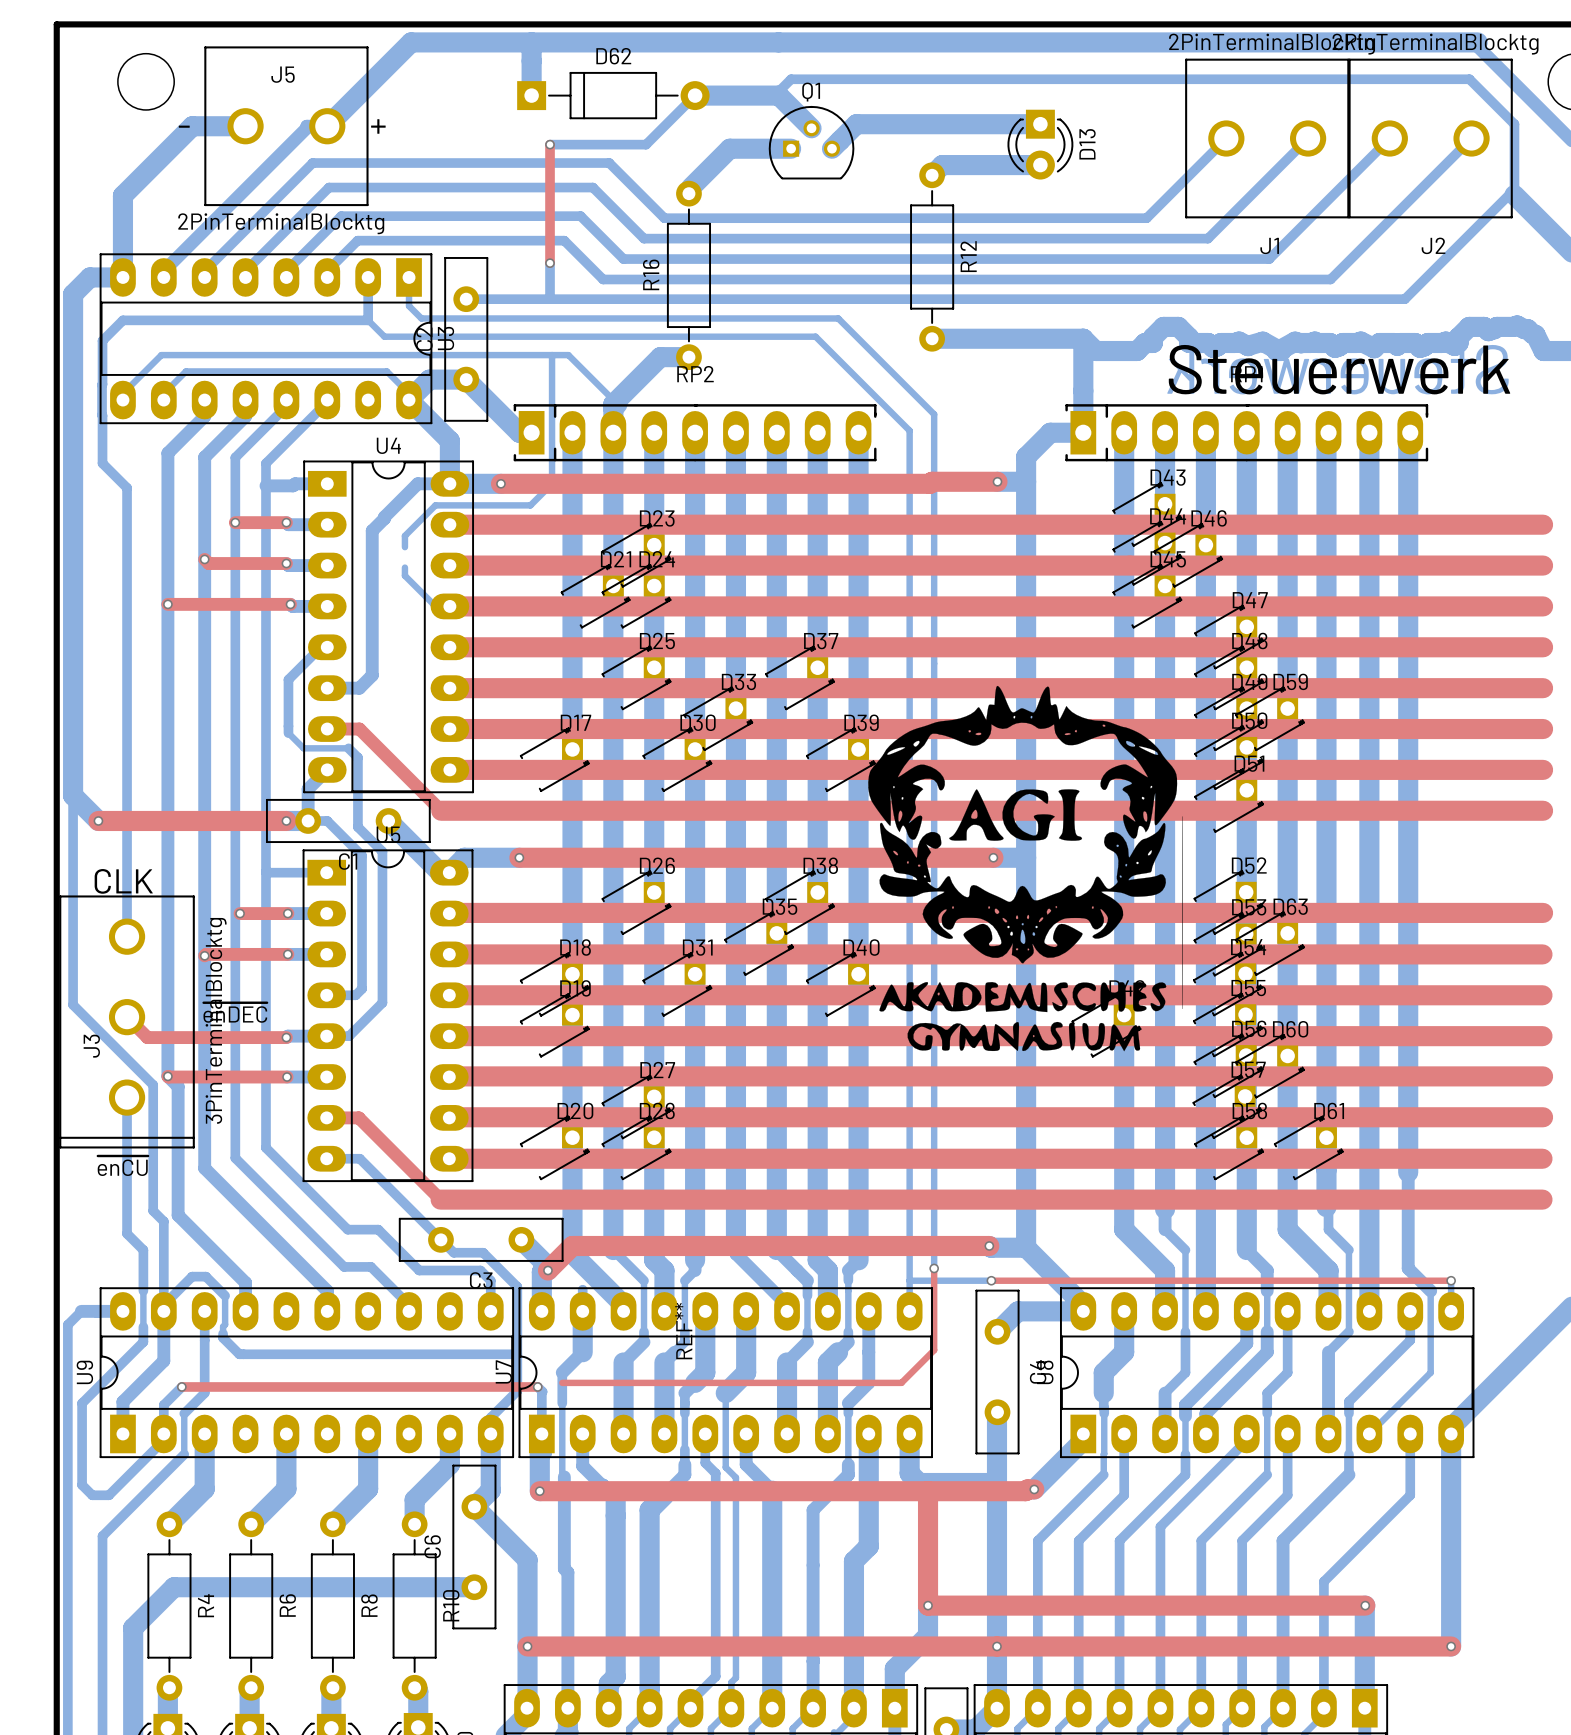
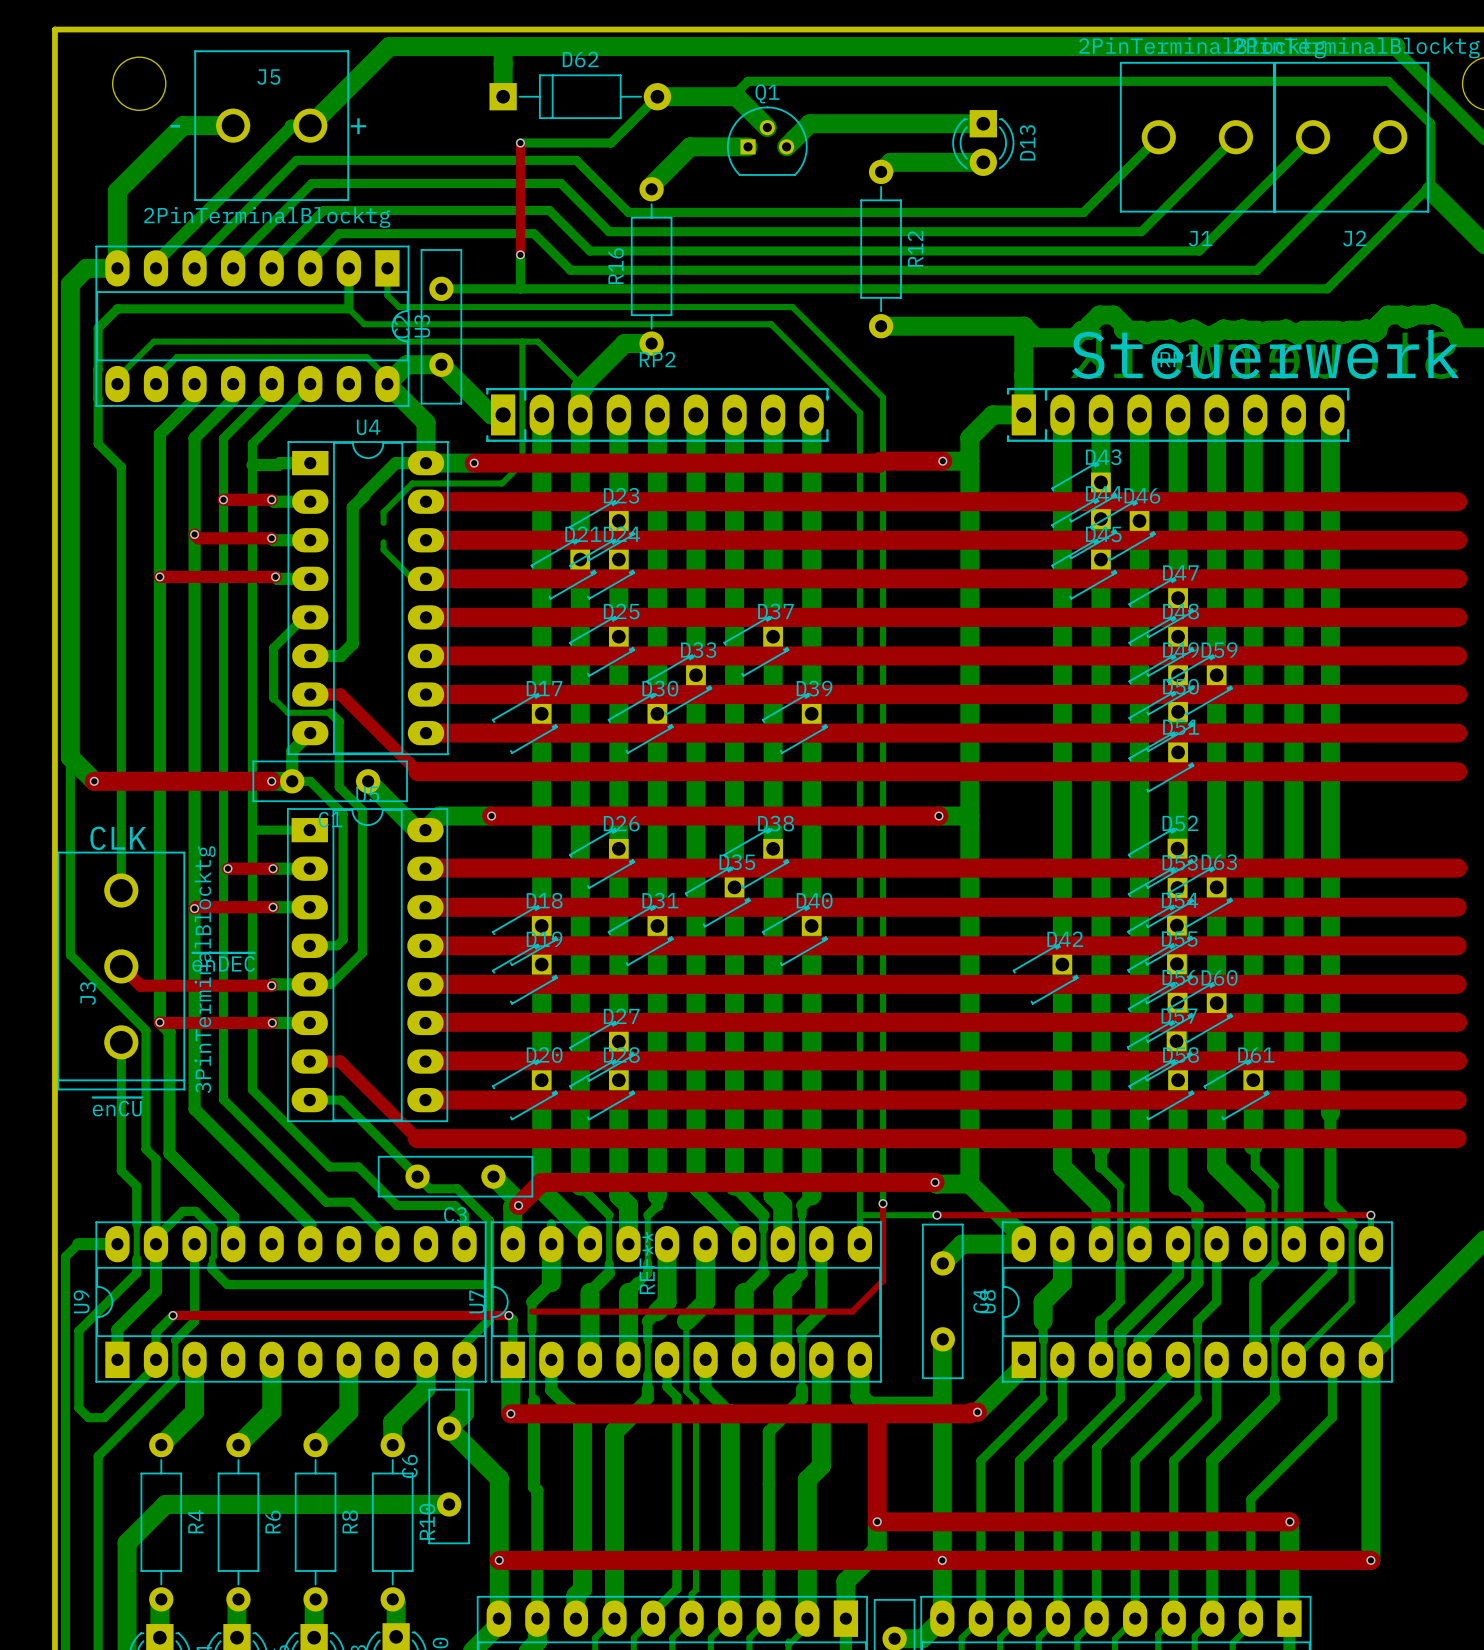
drawing: [868, 685, 1183, 1052] -> none

